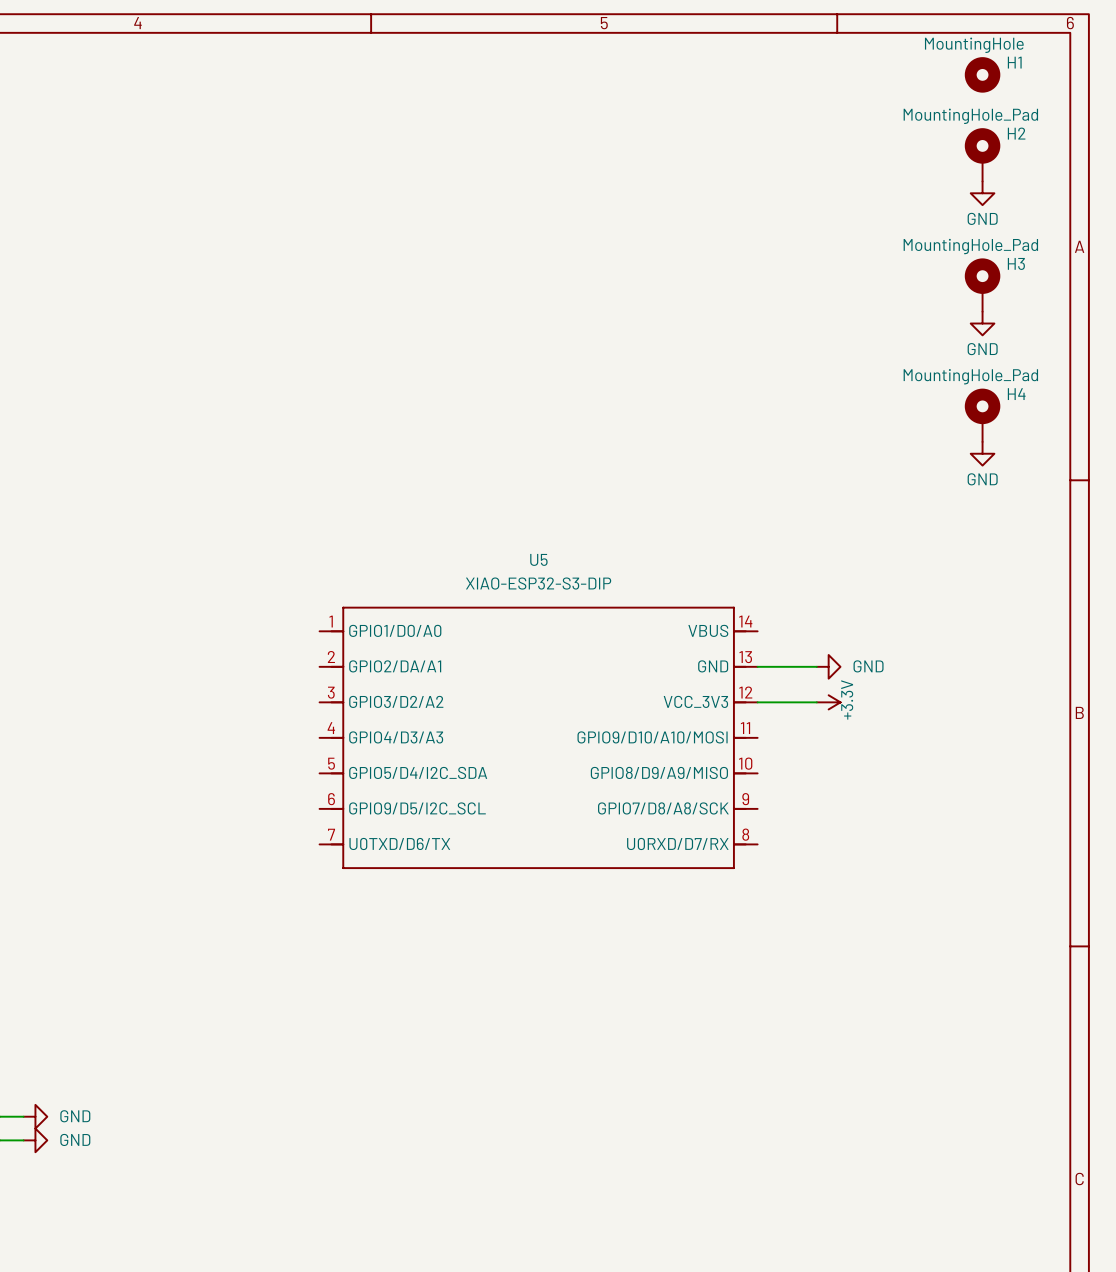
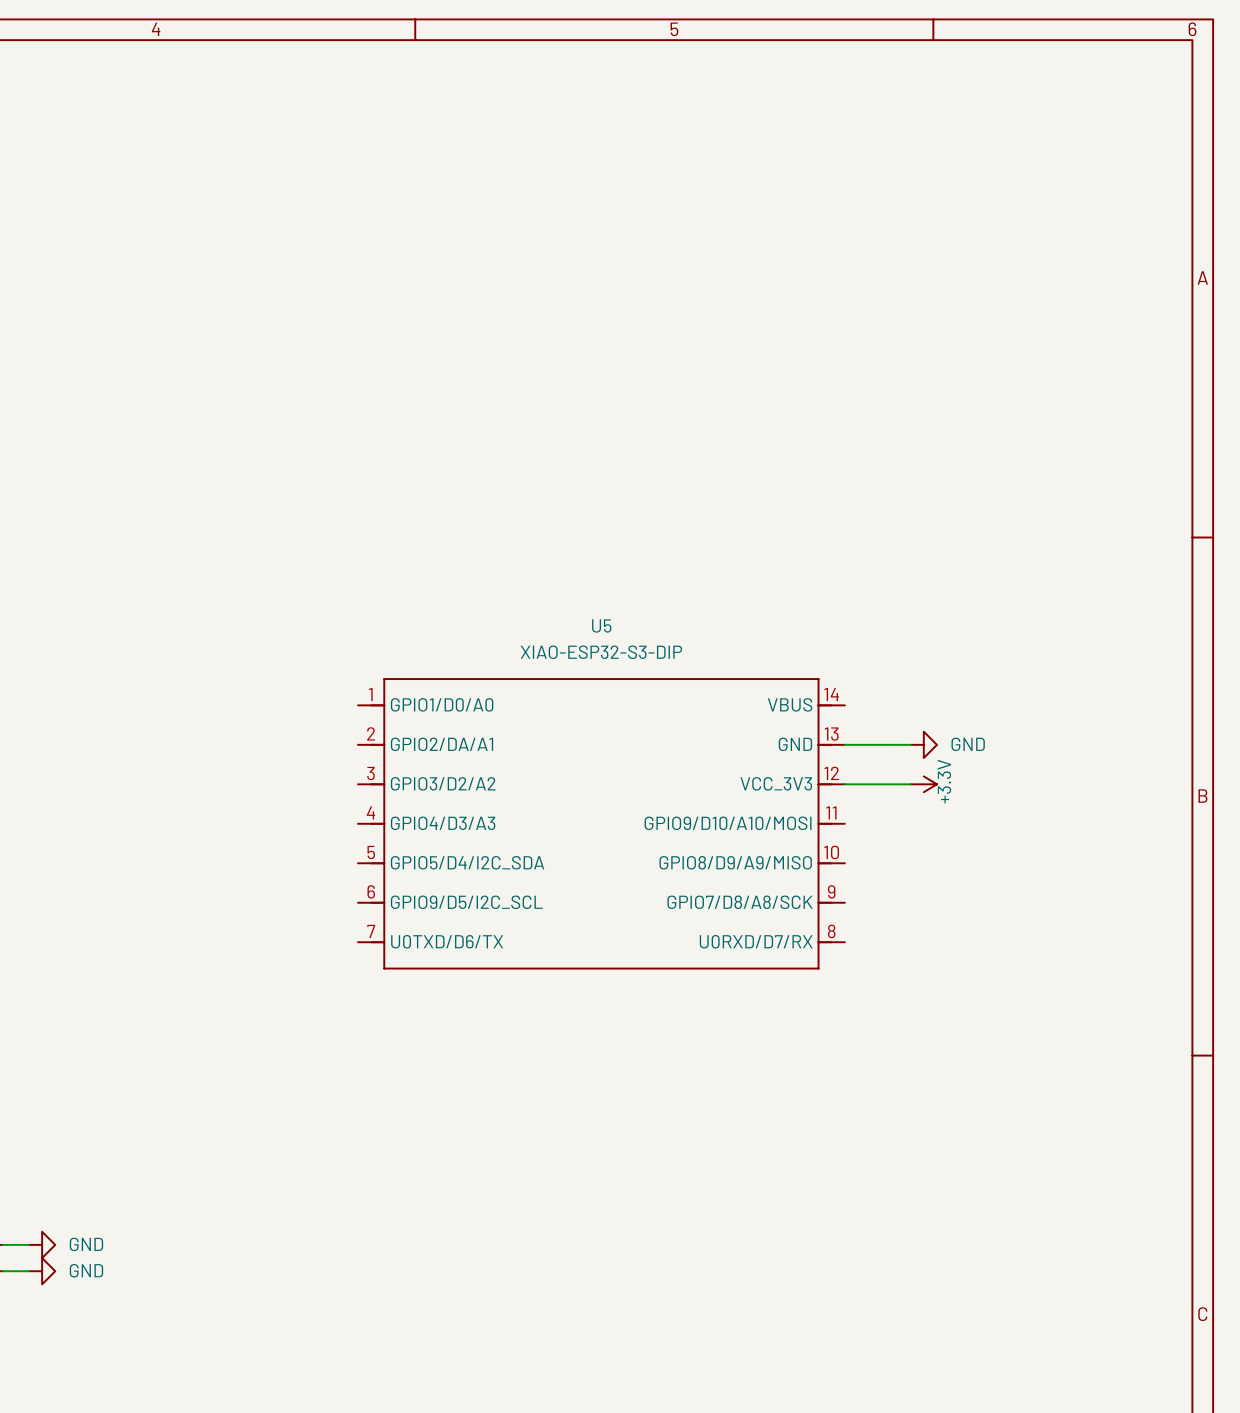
H1: MountingHole (982, 74) -> none
H2: MountingHole_Pad (982, 154) -> none
power symbol: GND (982, 193) -> none
H3: MountingHole_Pad (982, 285) -> none
power symbol: GND (982, 323) -> none
H4: MountingHole_Pad (982, 415) -> none
power symbol: GND (982, 453) -> none

